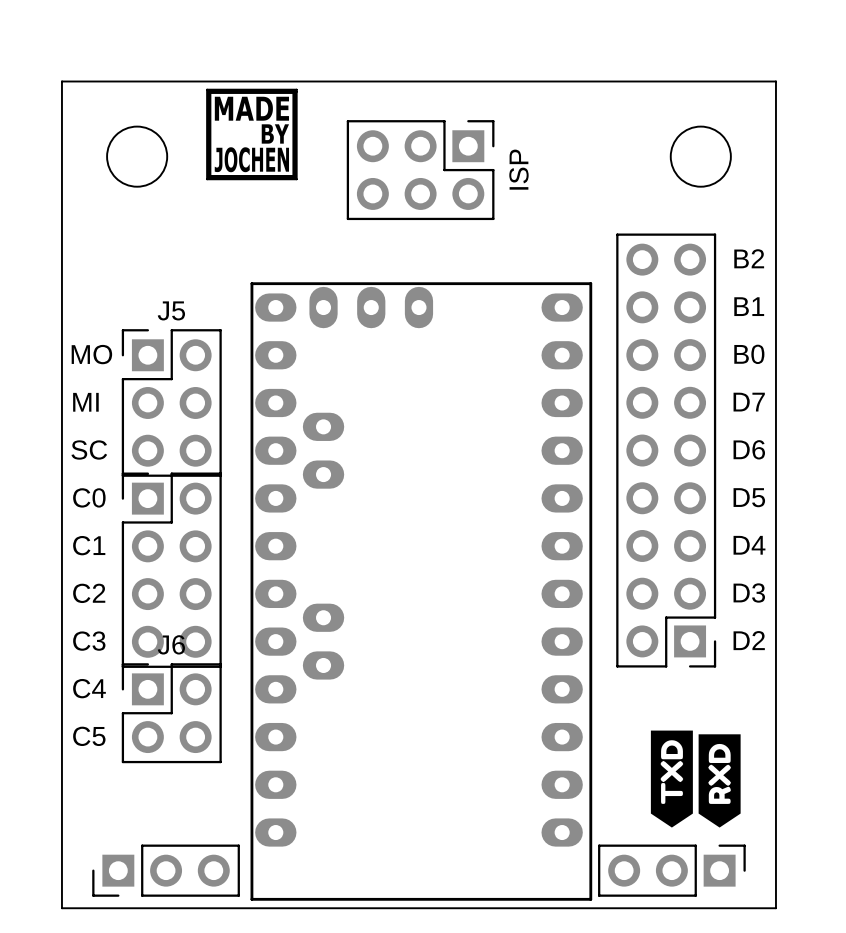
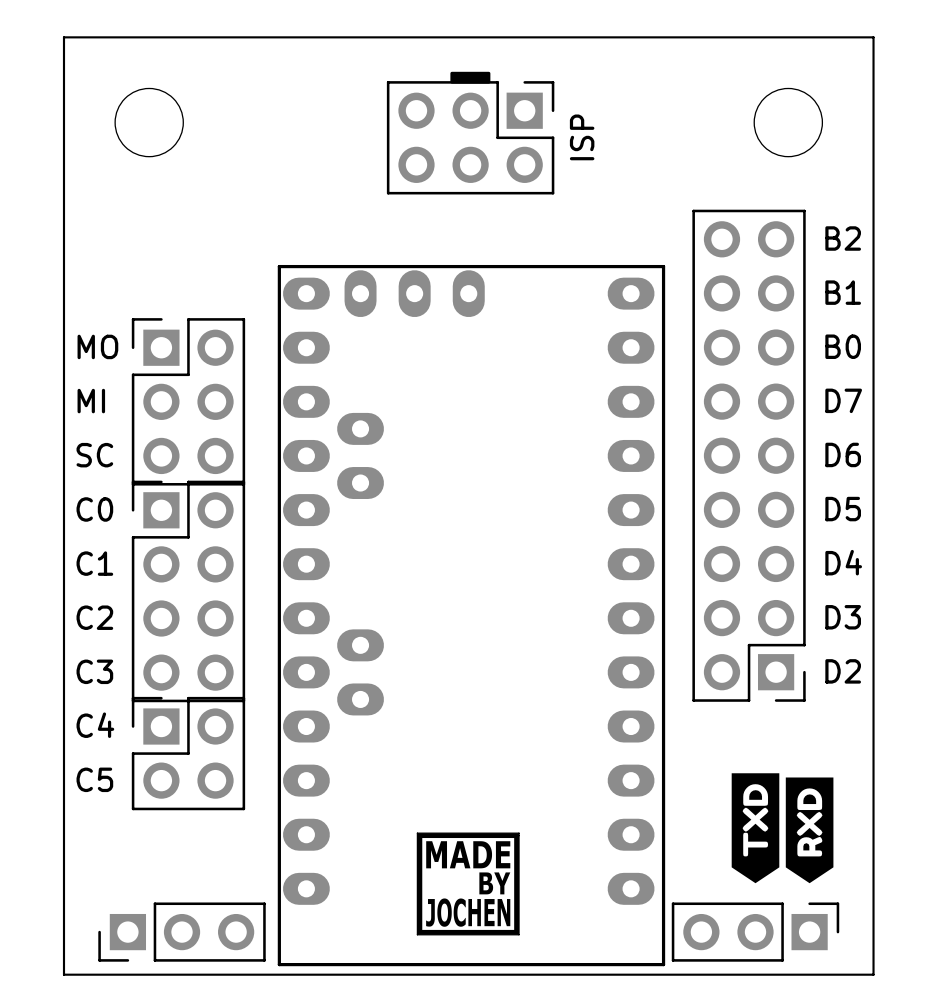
drawing: [206, 89, 297, 180] -> none
drawing: none -> [450, 71, 491, 84]
J5 name: J5 (171, 310) -> none
J6 name: J6 (171, 644) -> none
drawing: none -> [417, 832, 520, 936]

